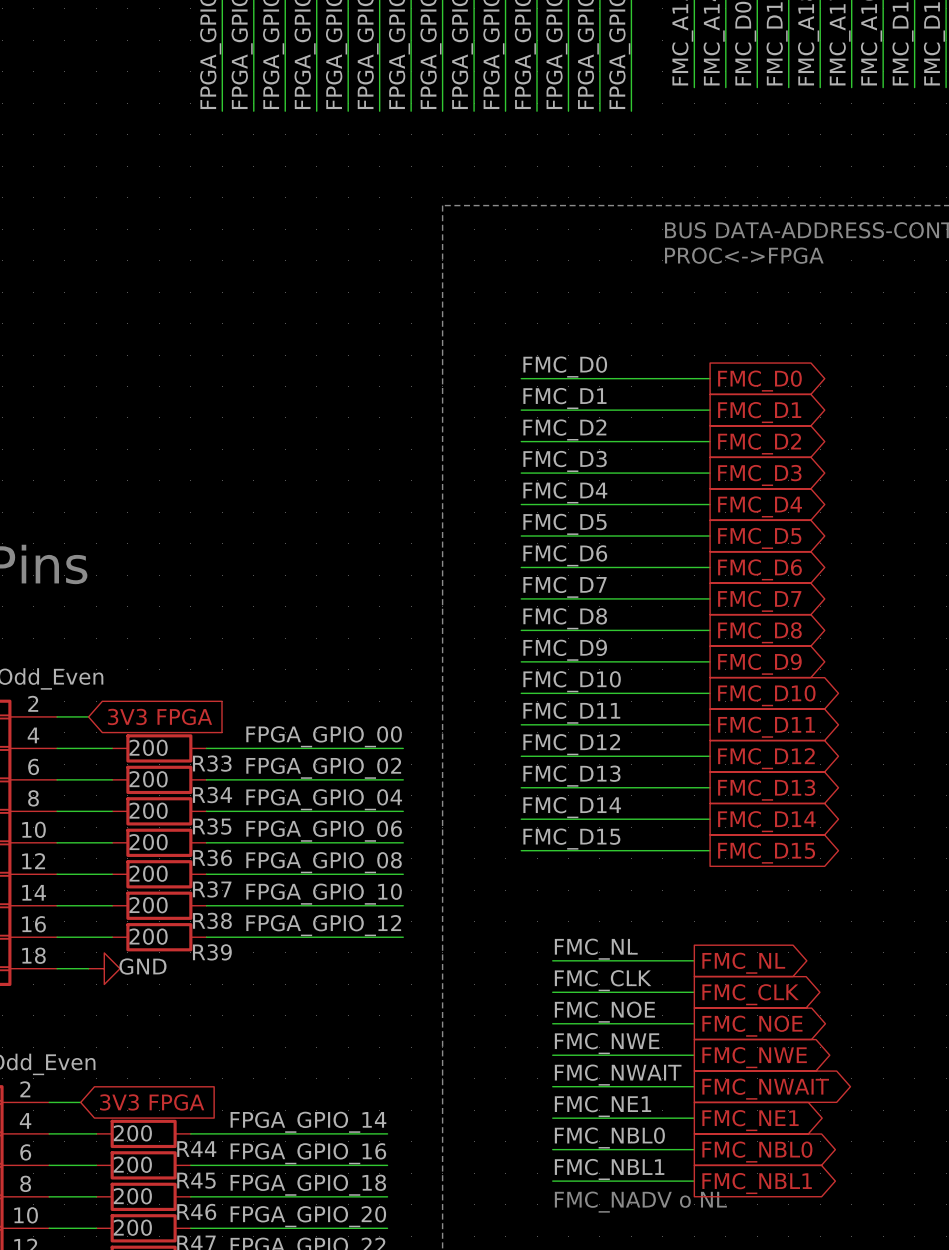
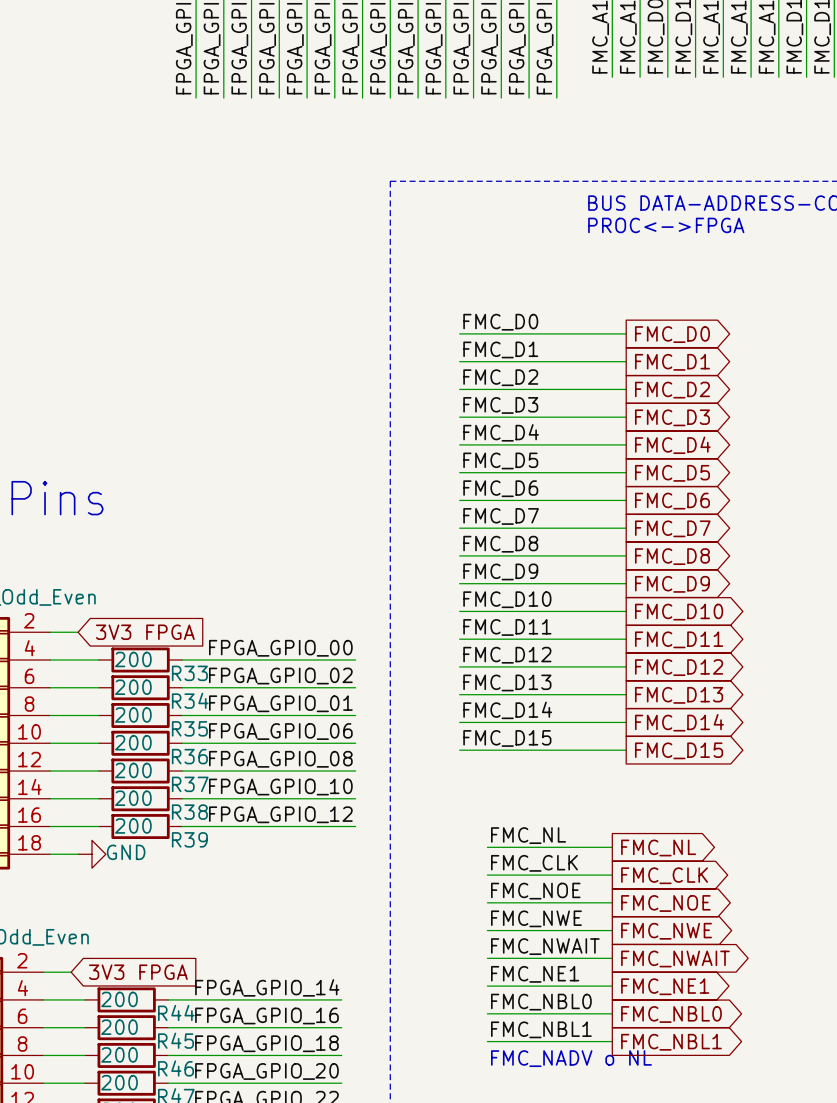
label: FPGA_GPIO_04 (324, 799) -> FPGA_GPIO_01 (280, 703)

